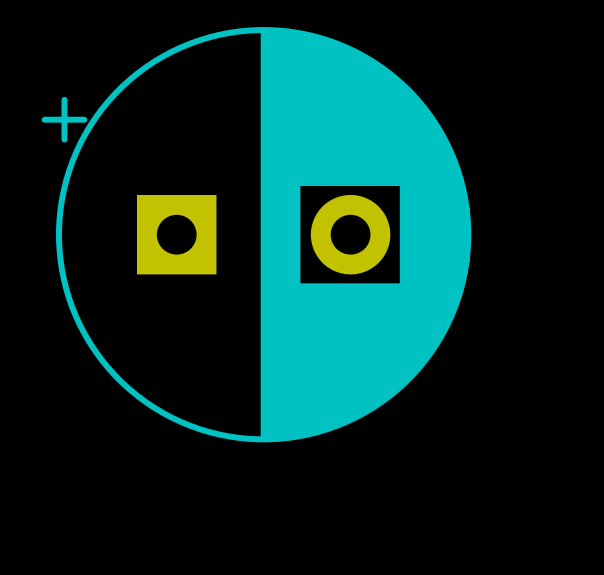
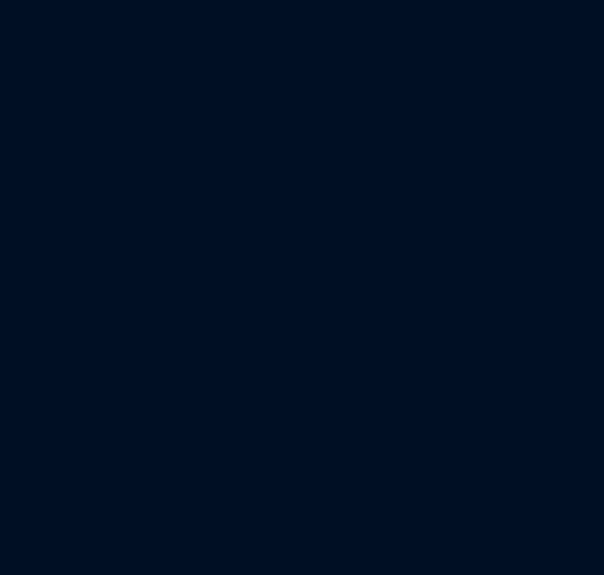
part: (256, 234) -> none

